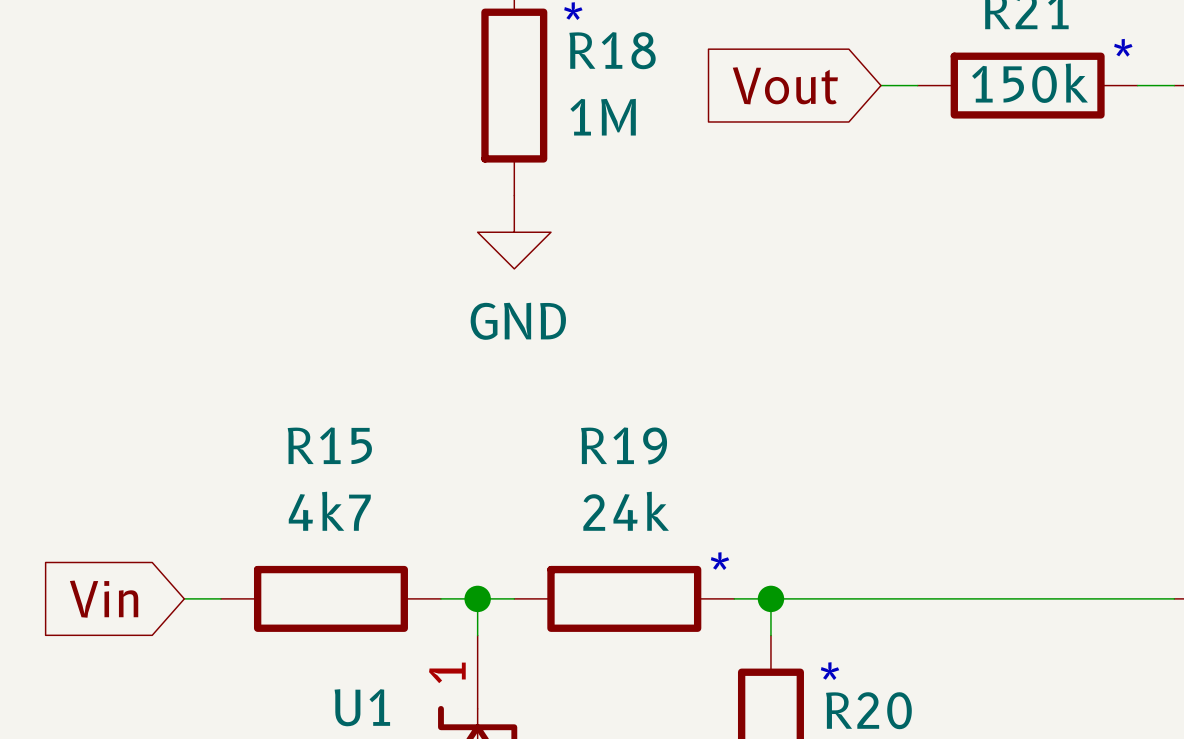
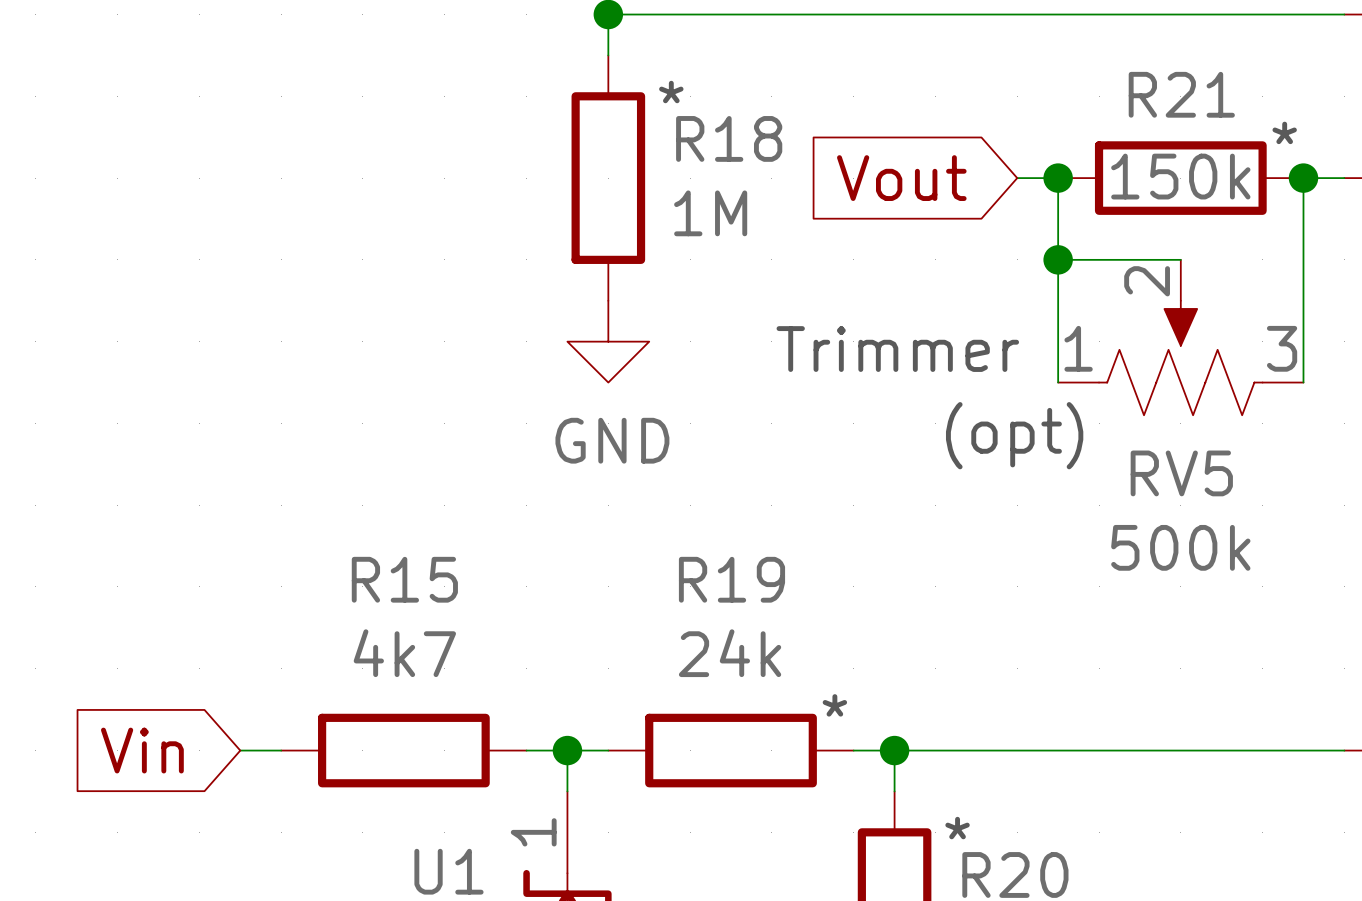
wire: none -> (1058, 178) (1058, 382)
junction: none -> (1058, 178)
wire: none -> (1303, 178) (1303, 382)
junction: none -> (1303, 178)
wire: none -> (1058, 259) (1180, 259)
junction: none -> (1058, 259)
RV5: none -> 500k (1180, 337)
text: none -> Trimmer (897, 349)
text: none -> (opt) (1014, 435)

